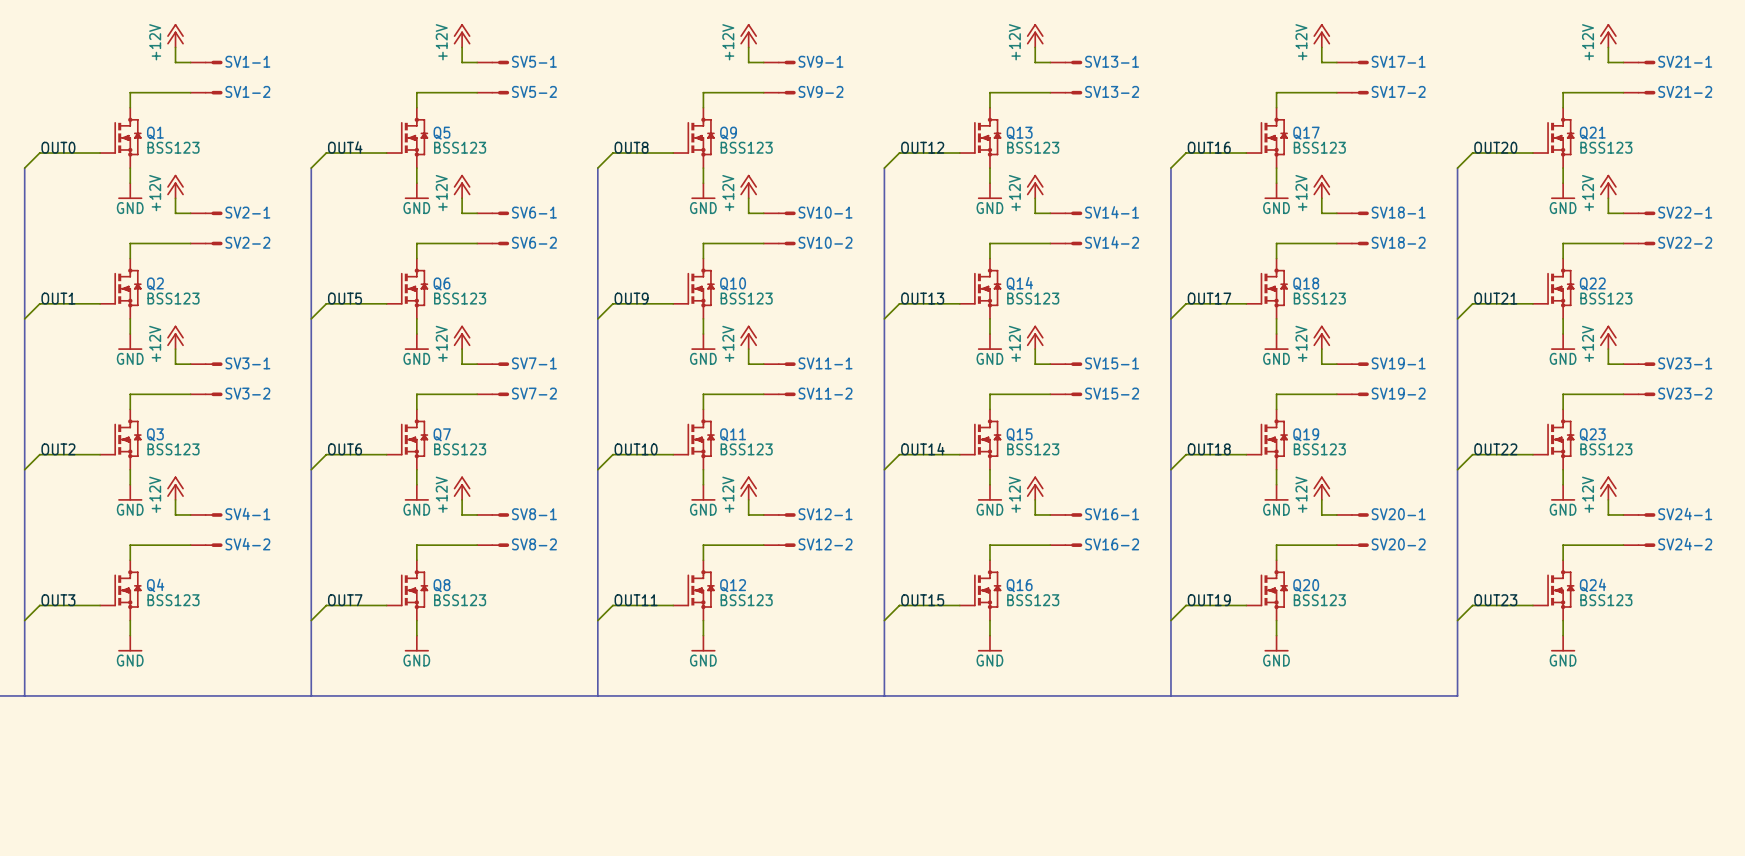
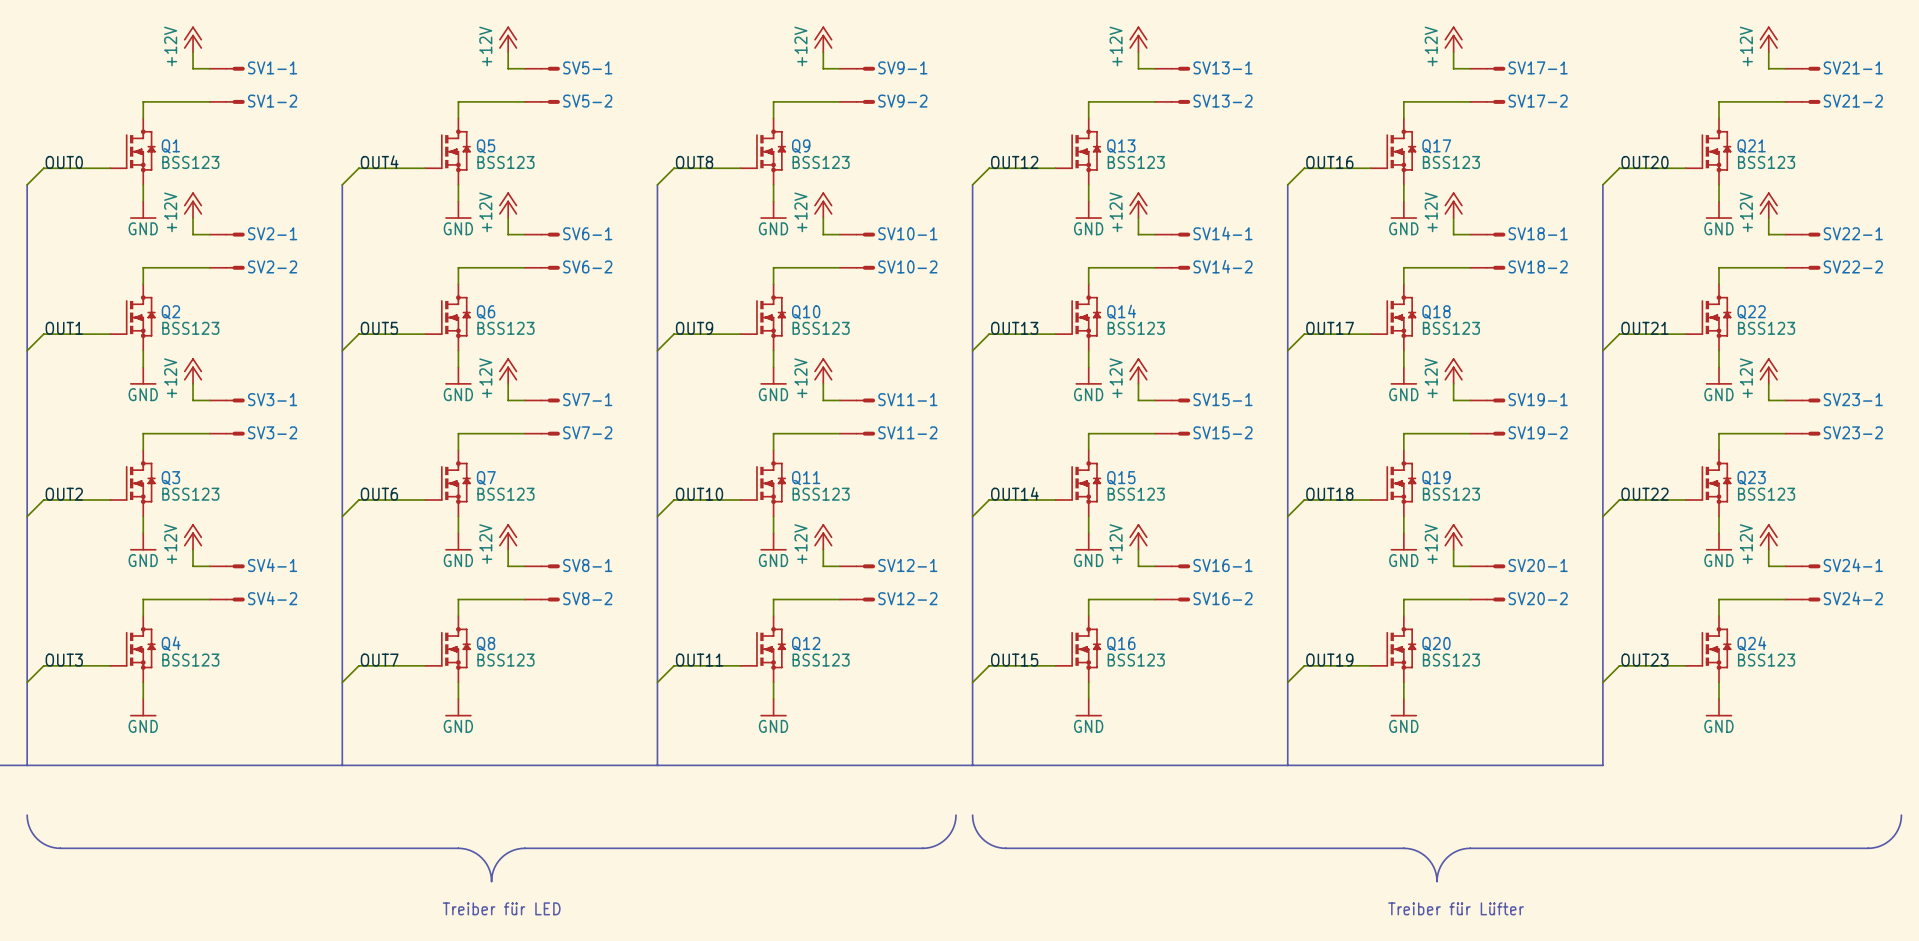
line: none -> (27, 815) (30, 829) (36, 838) (45, 845) (56, 848) (462, 848) (472, 851) (481, 858) (488, 867) (491, 881) (494, 867) (501, 858) (510, 851) (521, 848) (926, 848) (937, 845) (946, 838) (952, 829) (956, 815)
line: none -> (972, 815) (975, 829) (982, 838) (991, 845) (1002, 848) (1407, 848) (1418, 851) (1427, 858) (1433, 867) (1437, 881) (1440, 867) (1446, 858) (1455, 851) (1466, 848) (1871, 848) (1882, 845) (1891, 838) (1898, 829) (1901, 815)
text: none -> Treiber für LED (501, 908)
text: none -> Treiber für Lüfter (1456, 908)

